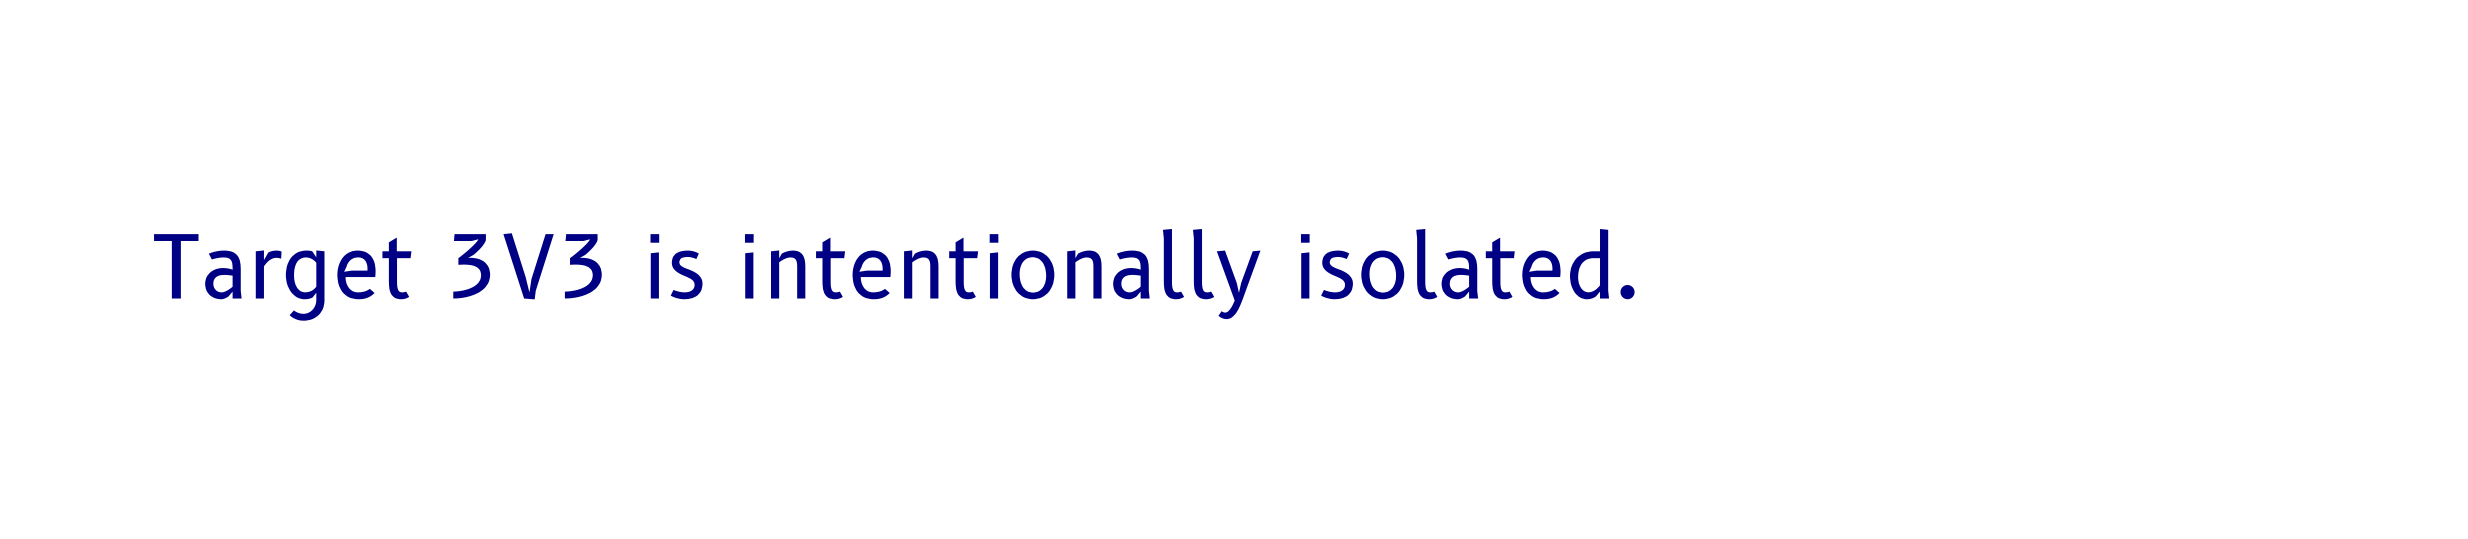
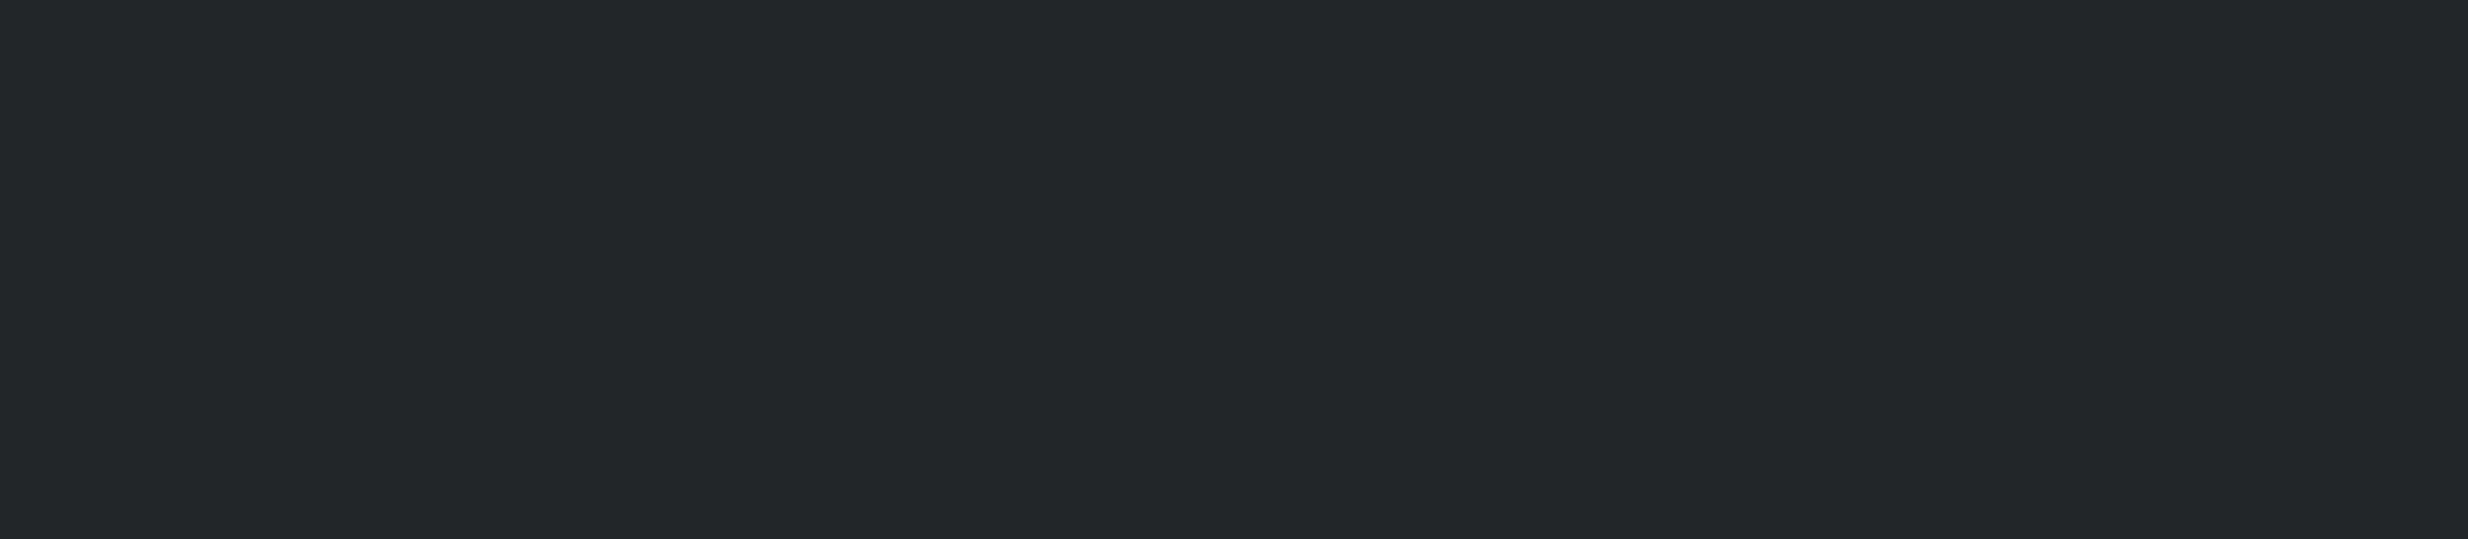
text: Target 3V3 is intentionally isolated. (894, 274) -> none

